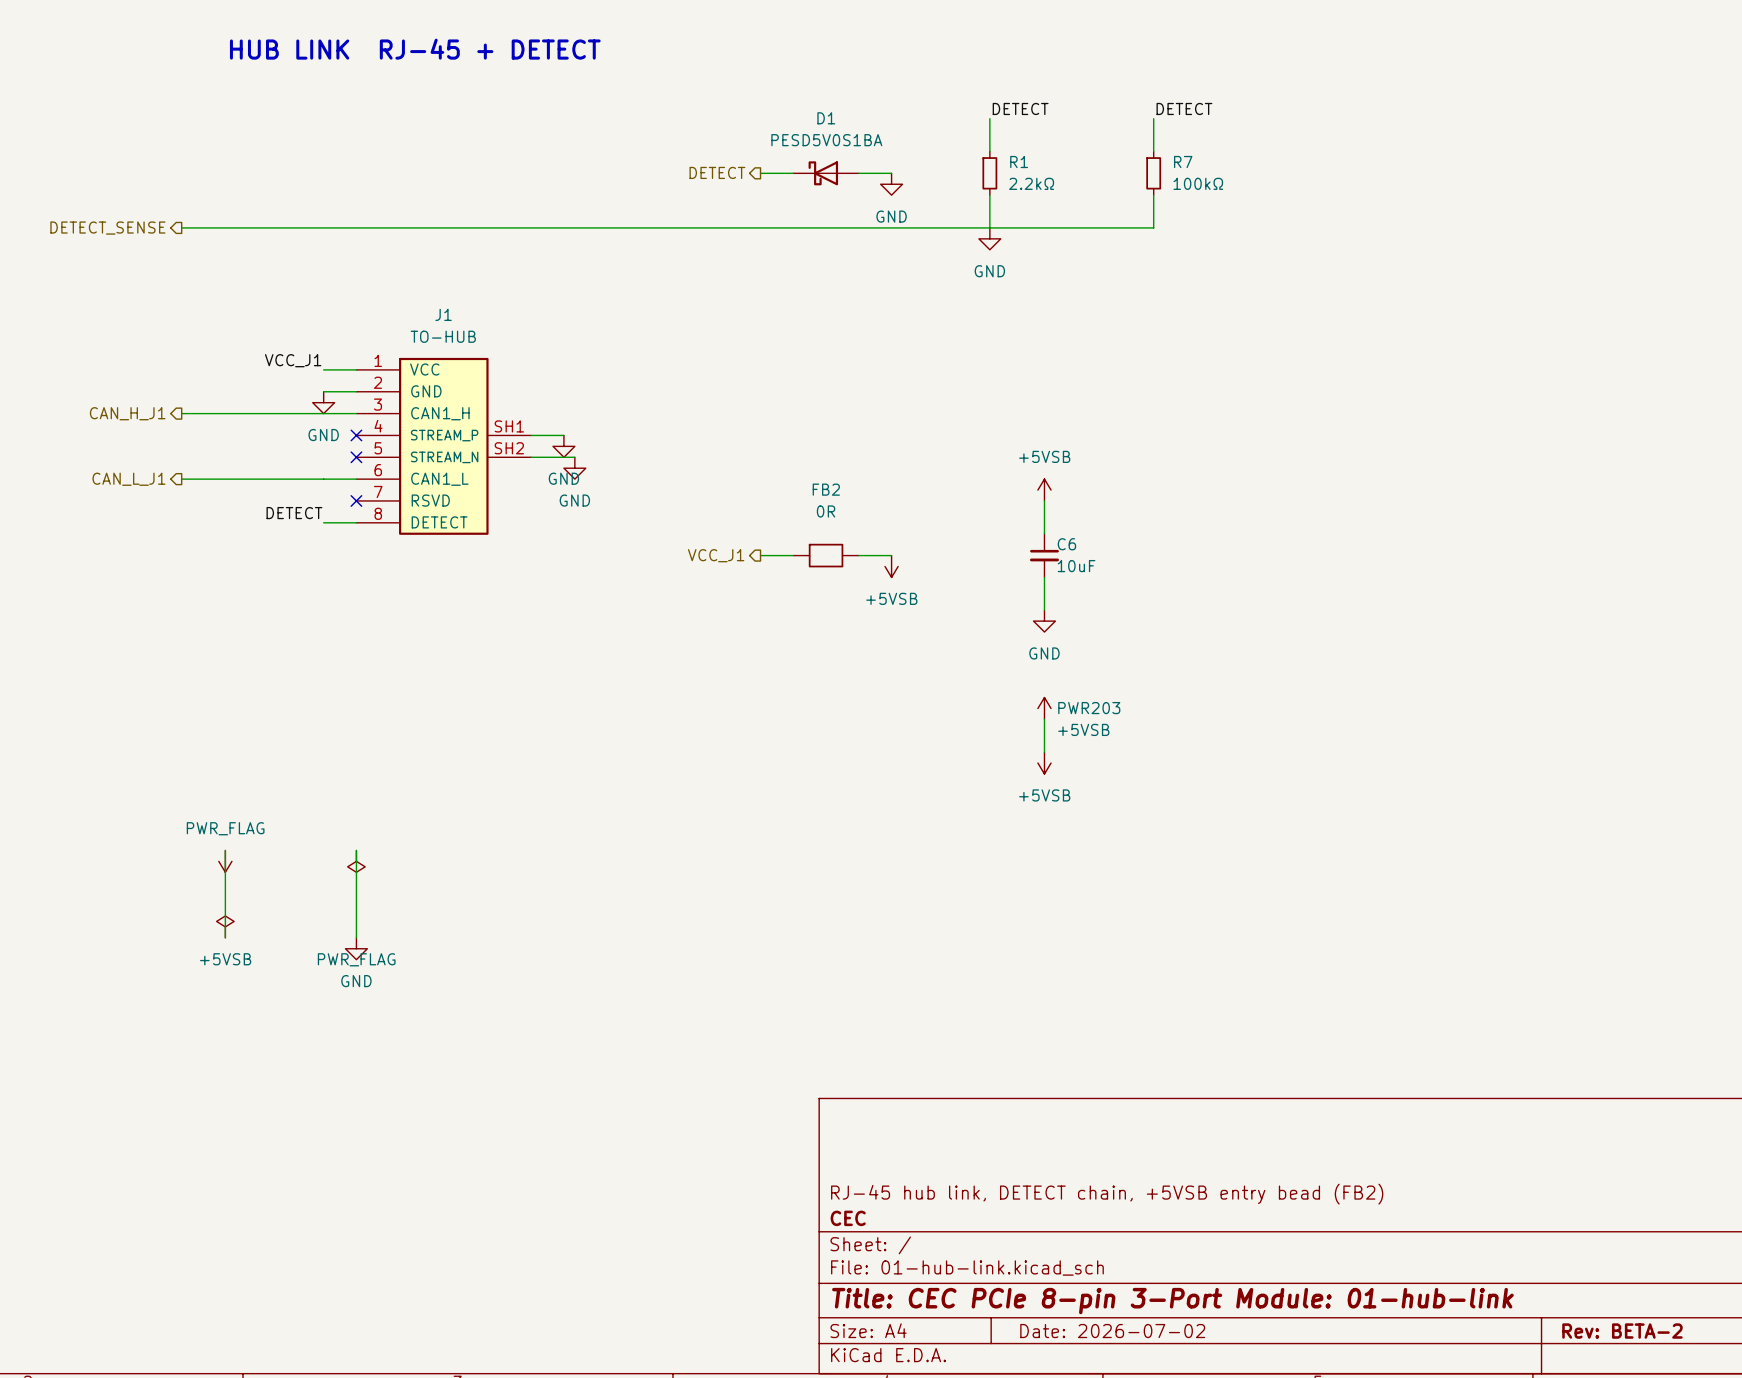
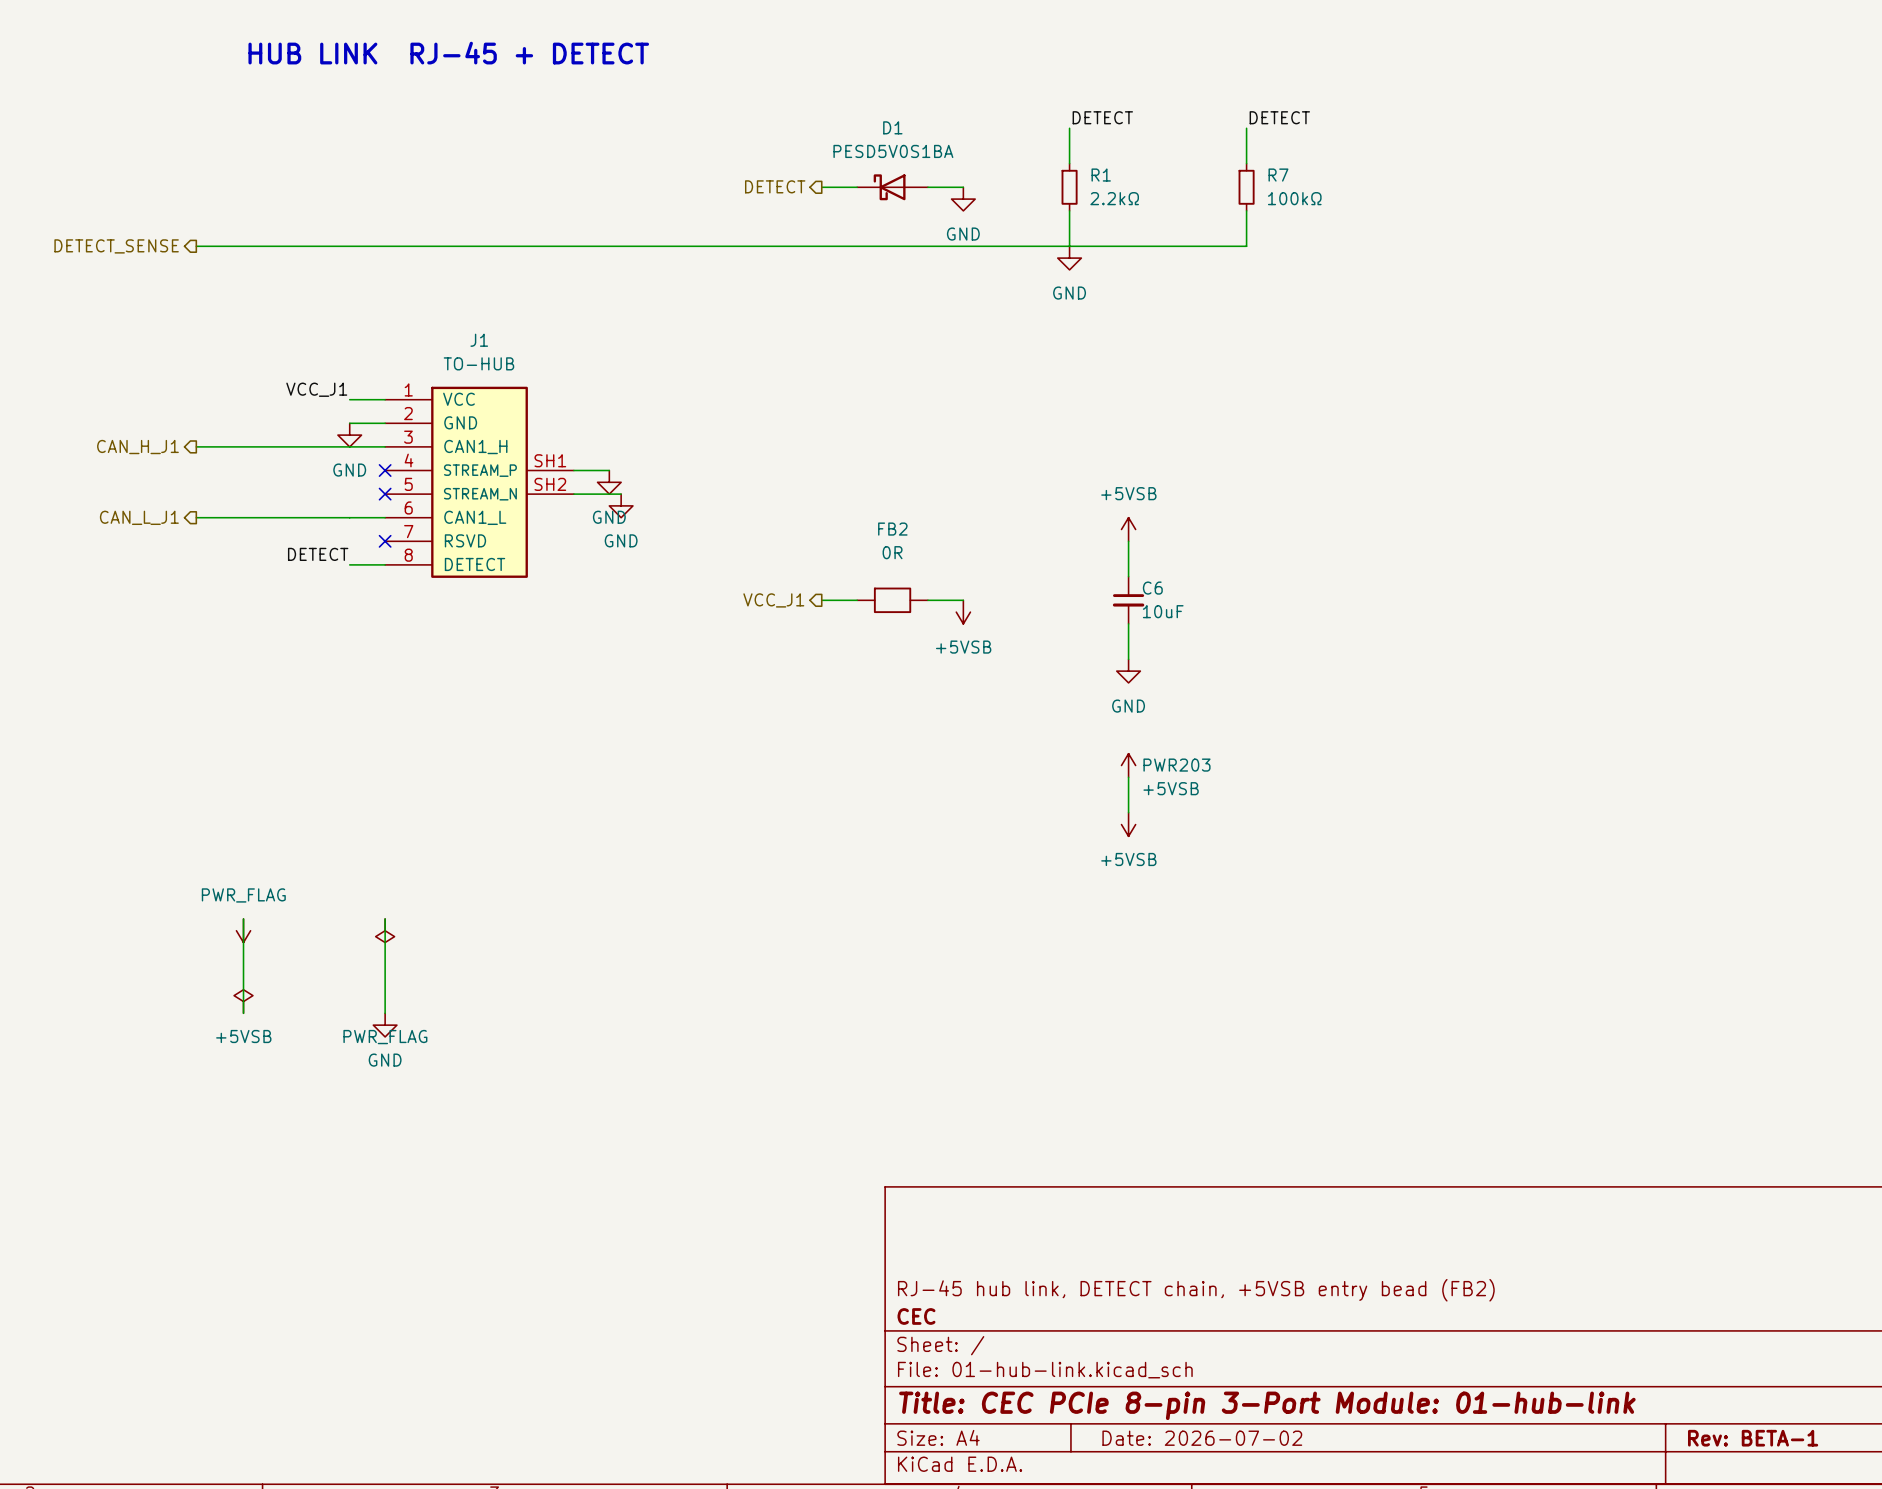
title block: Rev: BETA-2 (1622, 1331) -> Rev: BETA-1 (1753, 1438)

